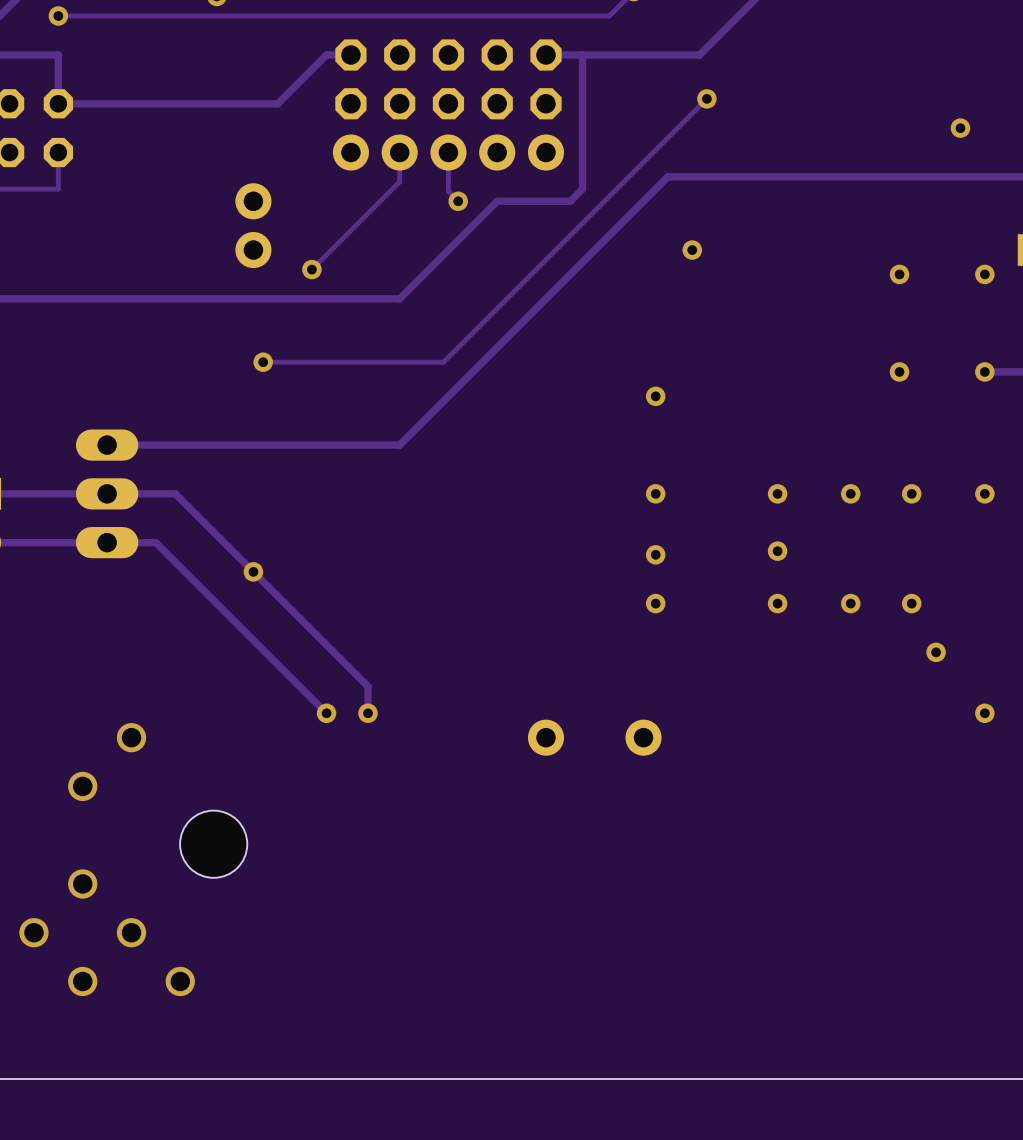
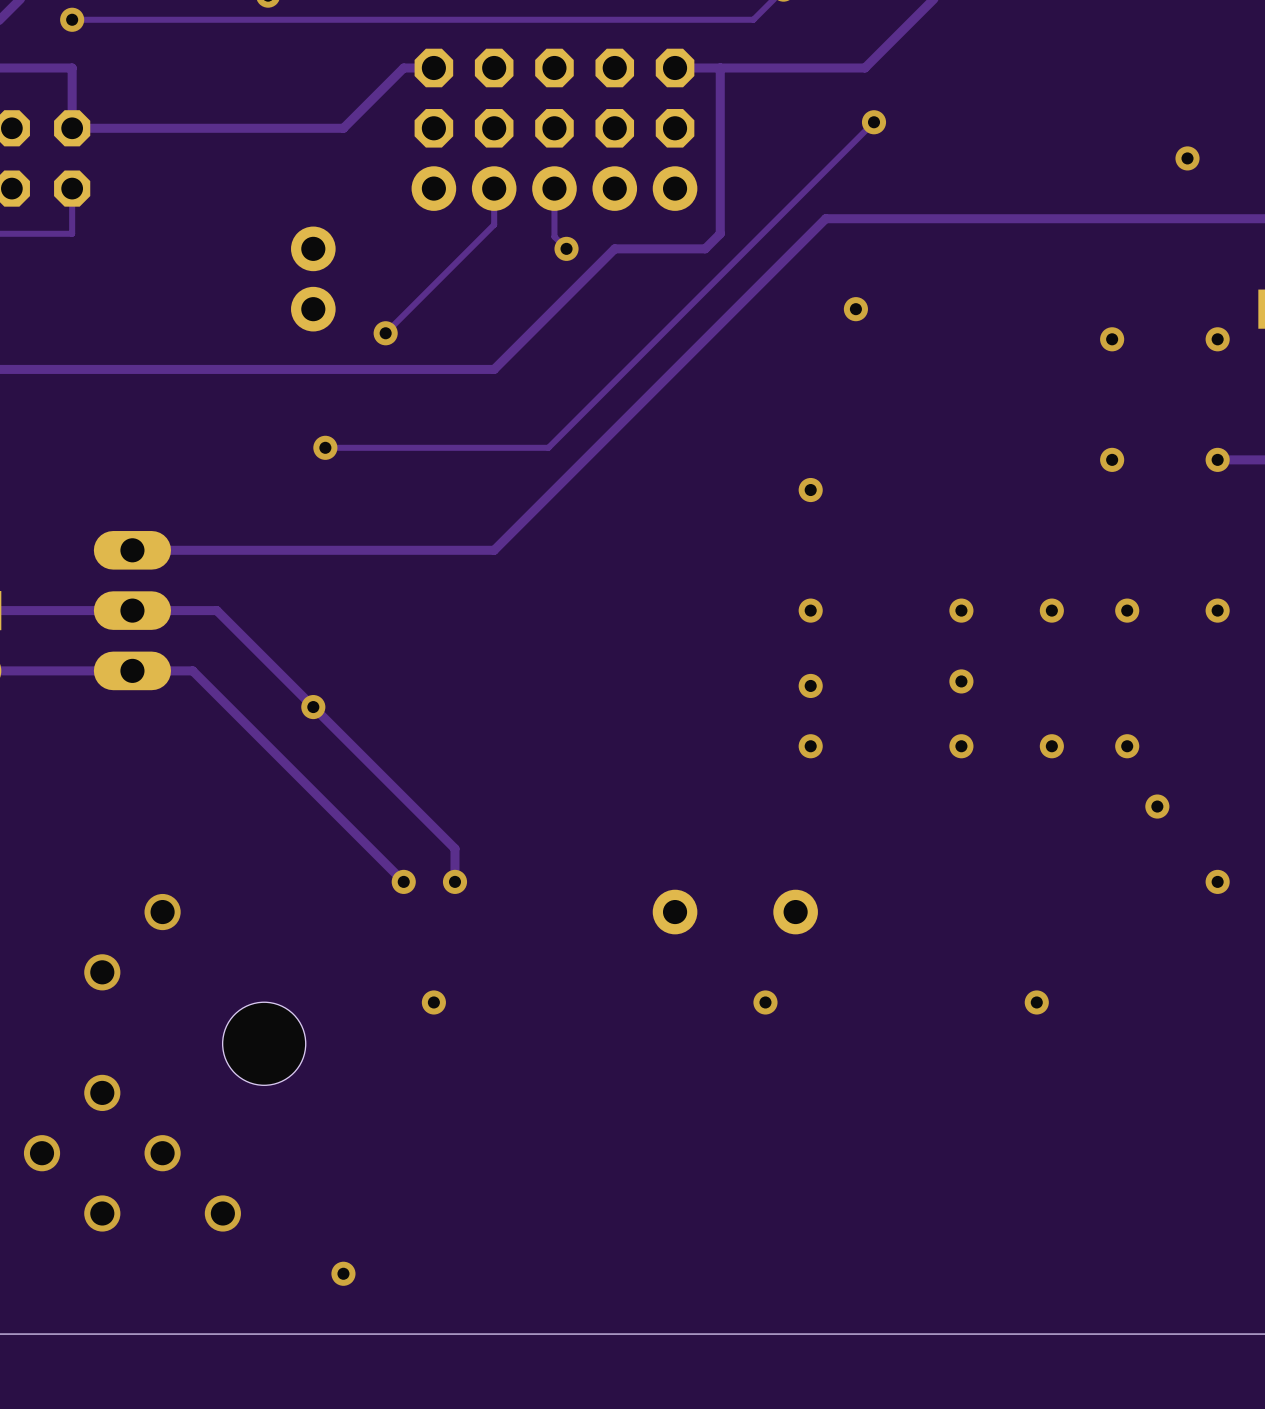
via: none -> (433, 1002)
via: none -> (765, 1002)
via: none -> (1036, 1002)
via: none -> (343, 1273)

